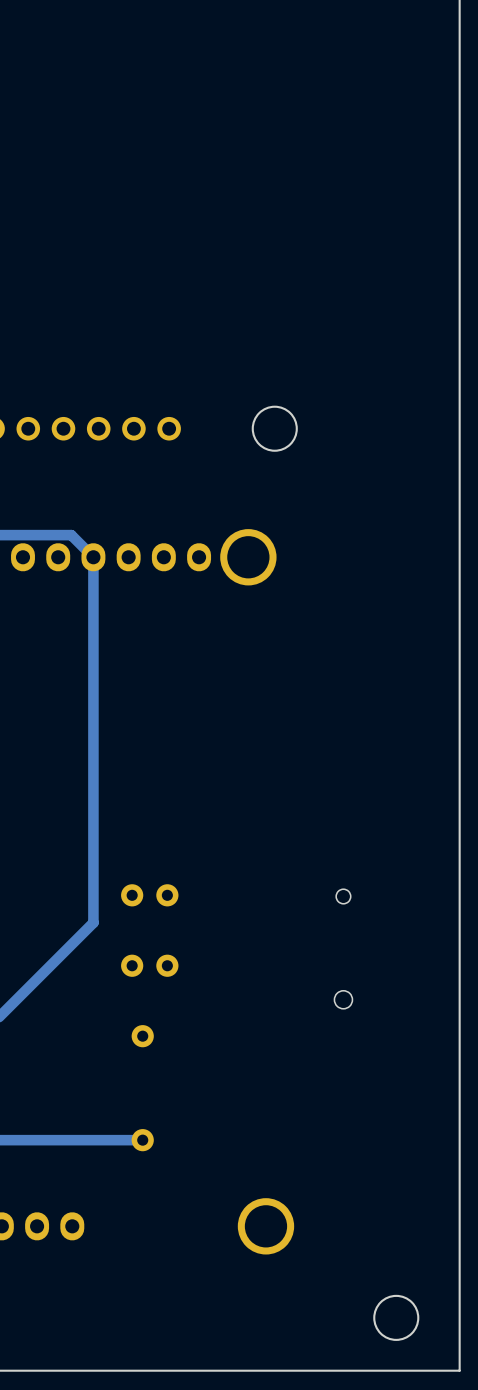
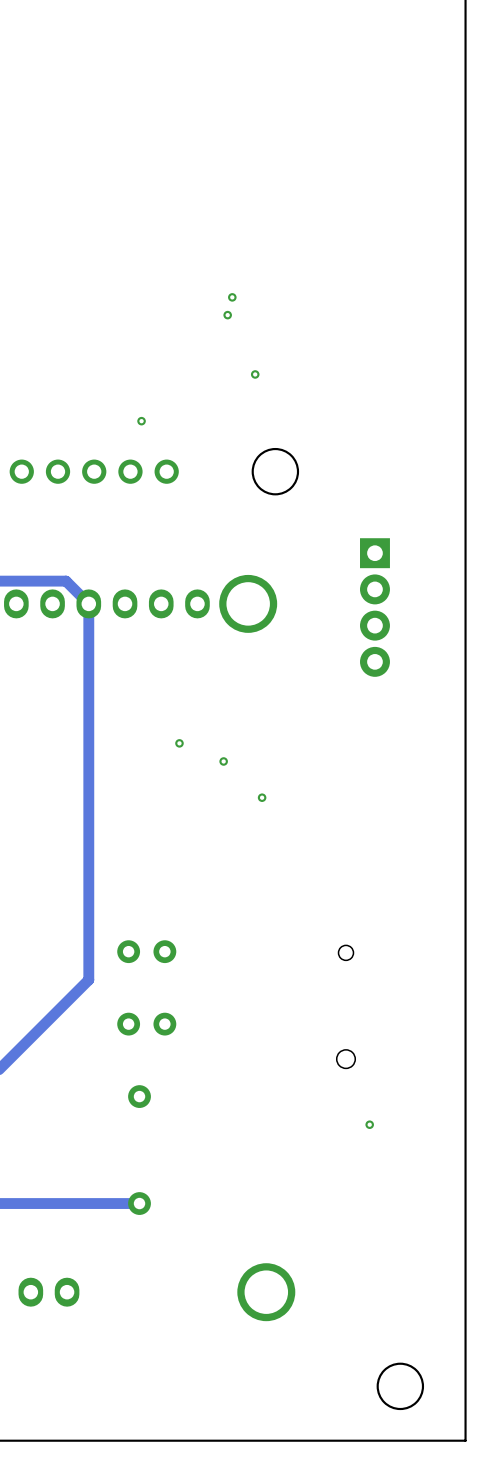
via: none -> (232, 297)
via: none -> (227, 315)
via: none -> (255, 374)
via: none -> (141, 421)
part: none -> (374, 607)
via: none -> (179, 743)
via: none -> (223, 761)
via: none -> (262, 797)
via: none -> (369, 1124)

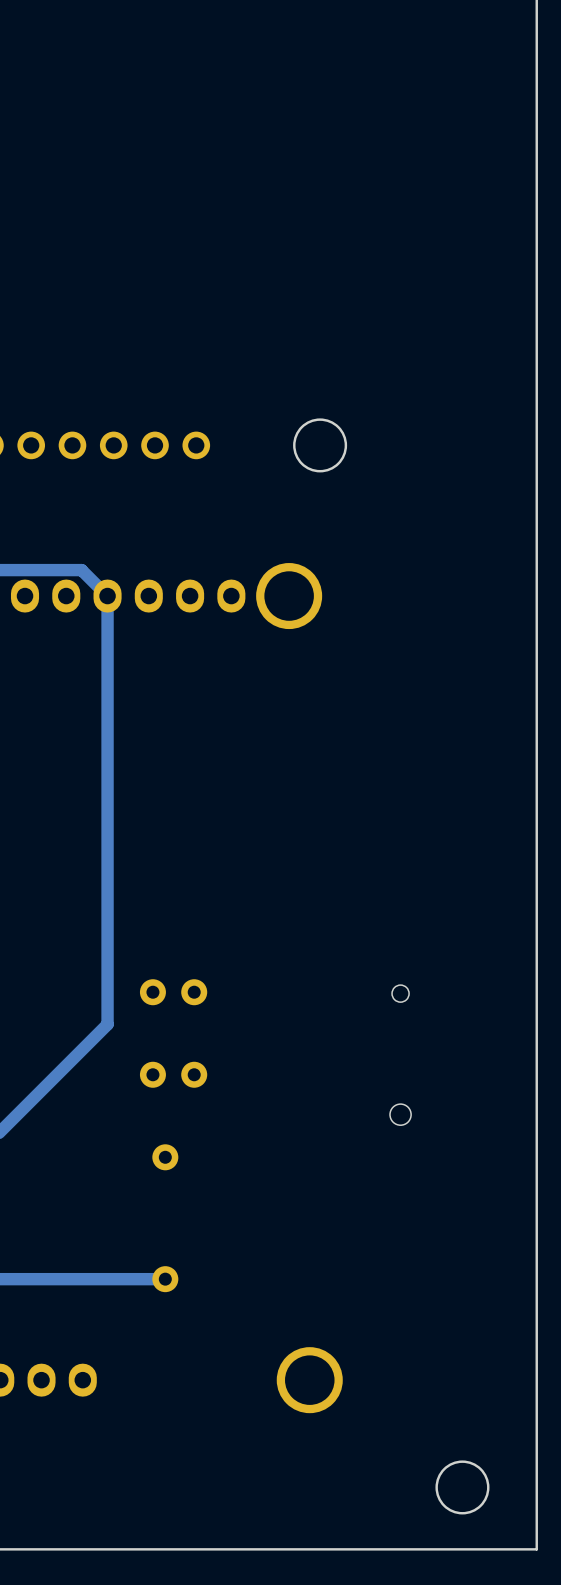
via: (232, 297) -> none
via: (227, 315) -> none
via: (255, 374) -> none
via: (141, 421) -> none
part: (374, 607) -> none
via: (179, 743) -> none
via: (223, 761) -> none
via: (262, 797) -> none
via: (369, 1124) -> none

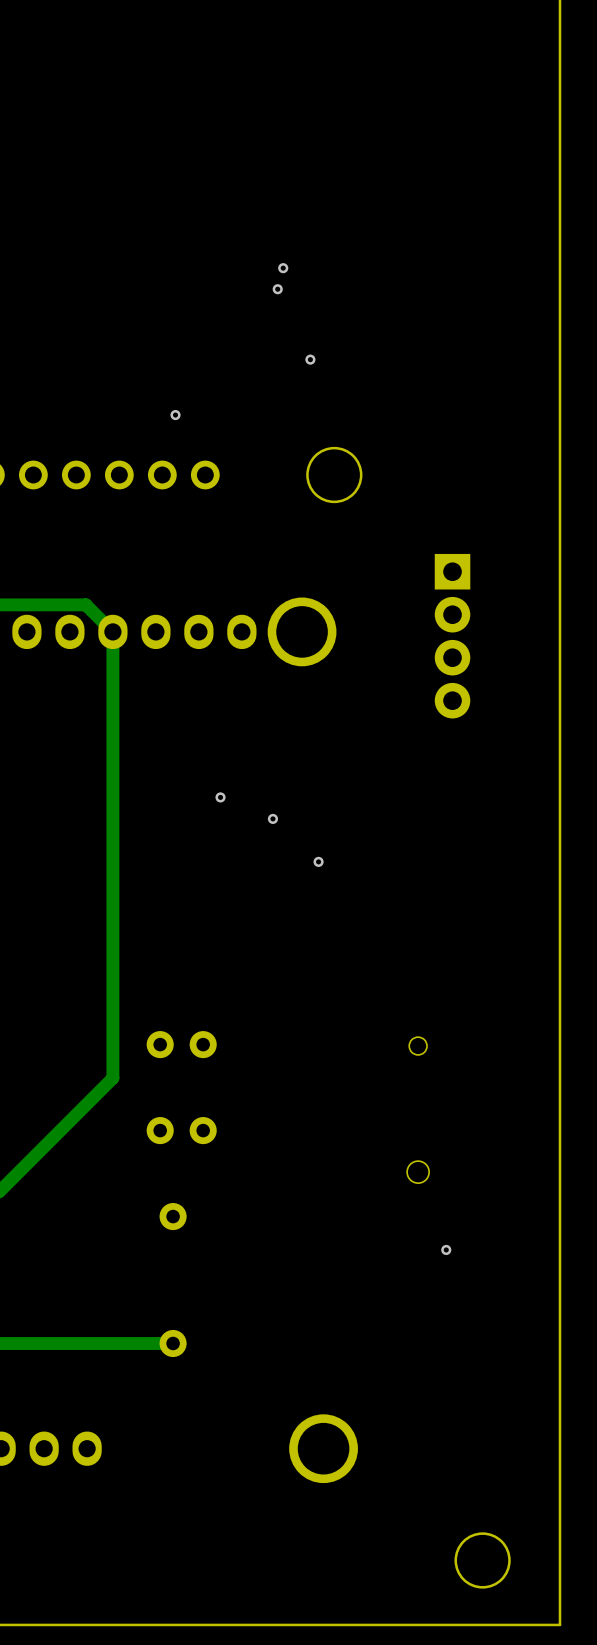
via: none -> (283, 268)
via: none -> (277, 289)
via: none -> (310, 359)
via: none -> (175, 415)
part: none -> (452, 636)
via: none -> (220, 797)
via: none -> (272, 818)
via: none -> (318, 861)
via: none -> (446, 1249)

